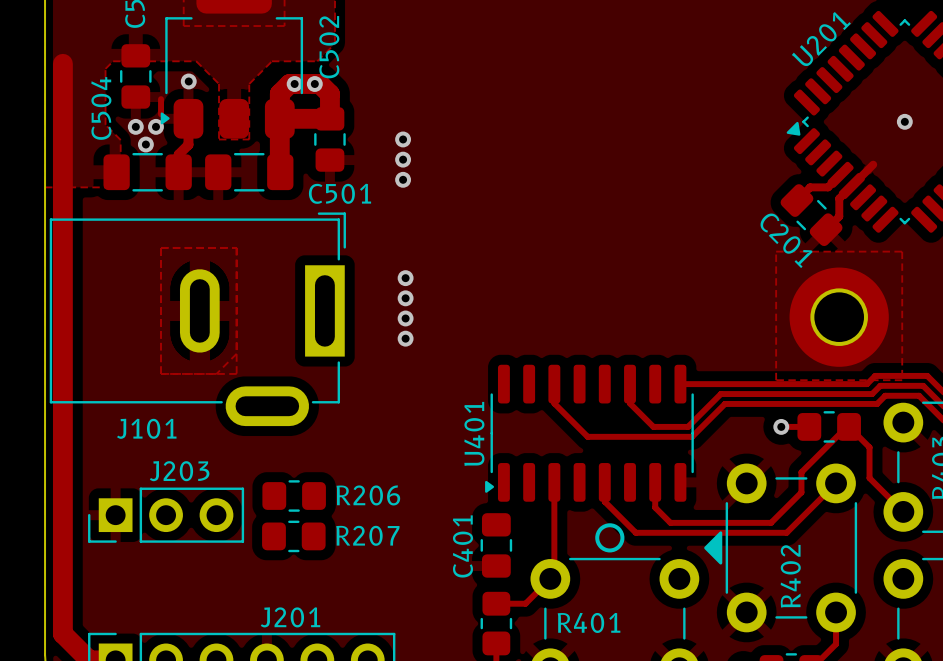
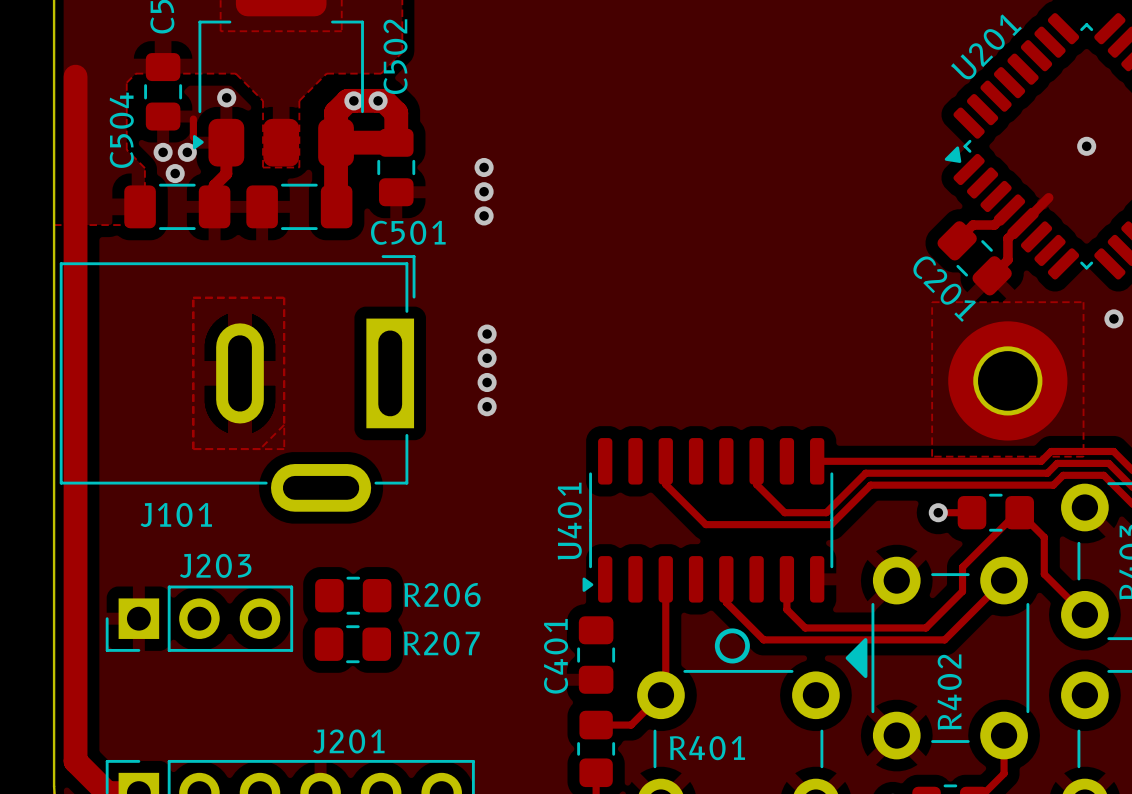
via: none -> (1113, 318)

